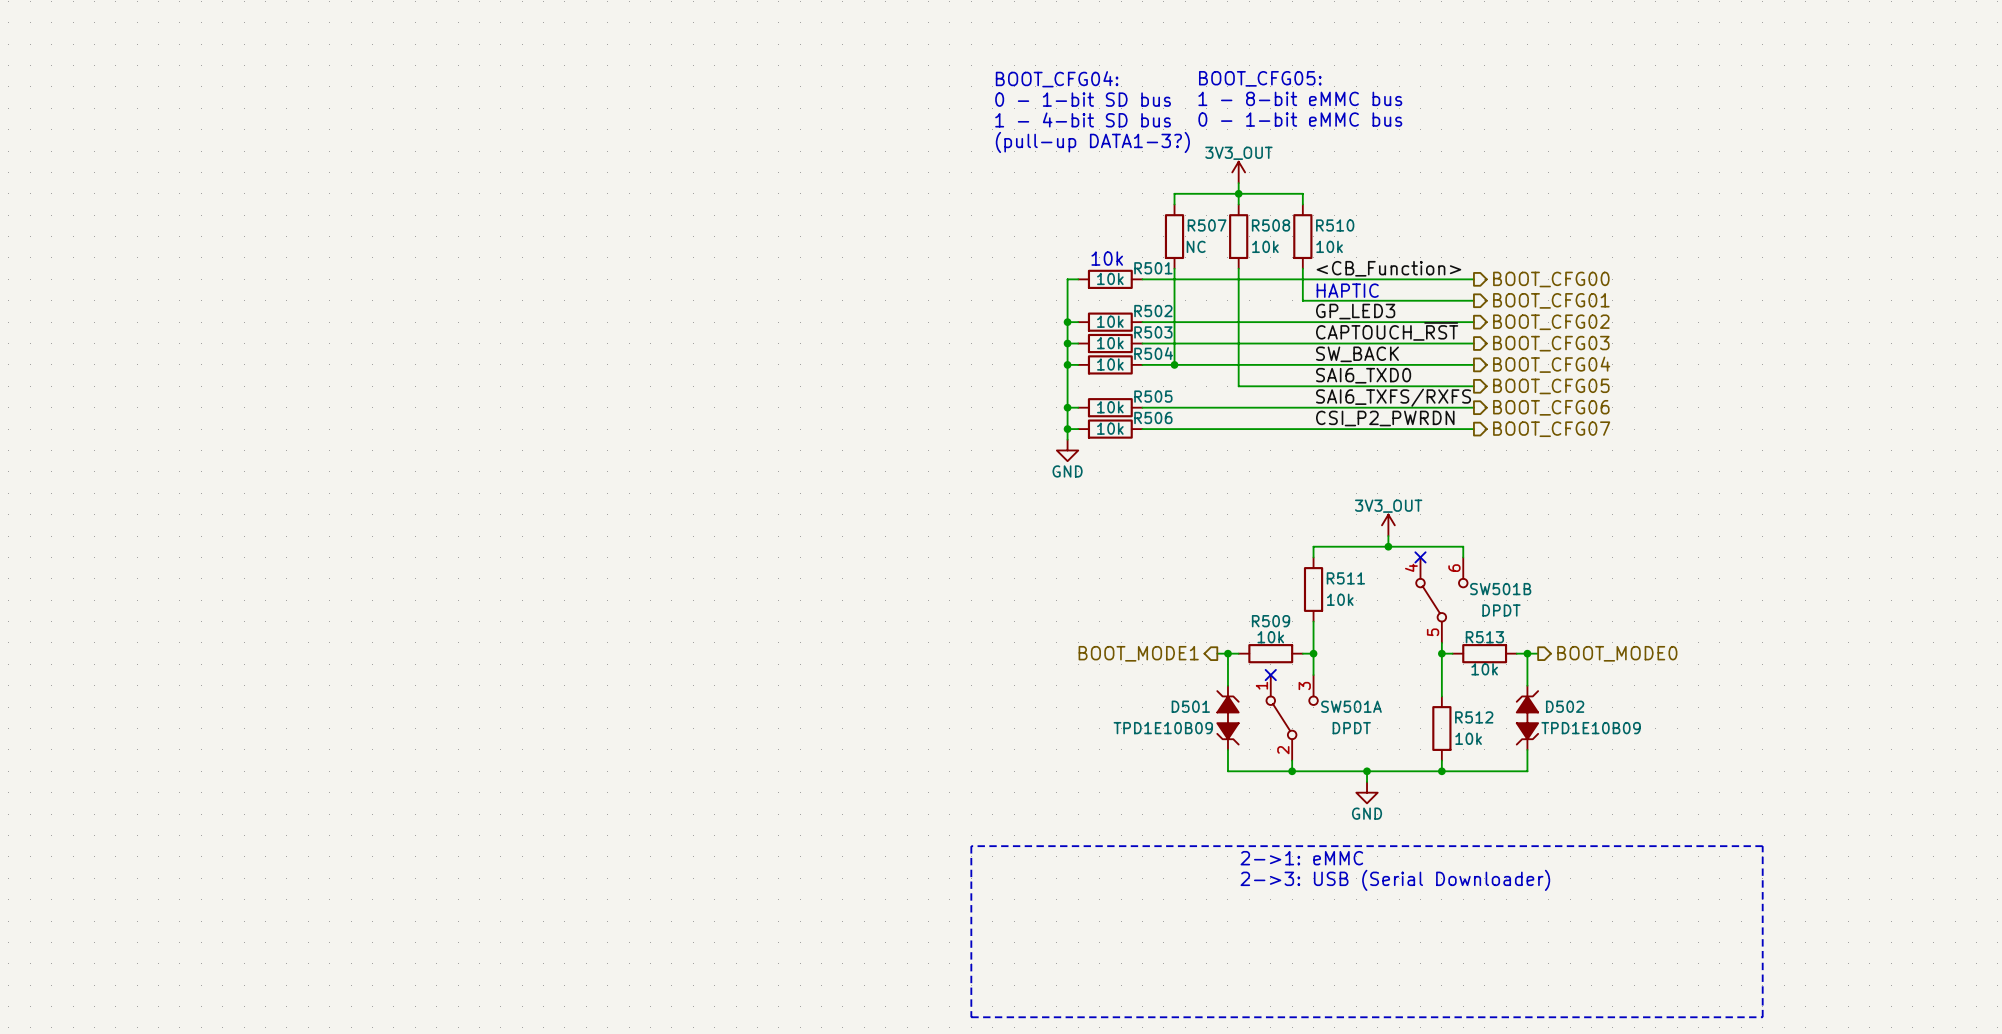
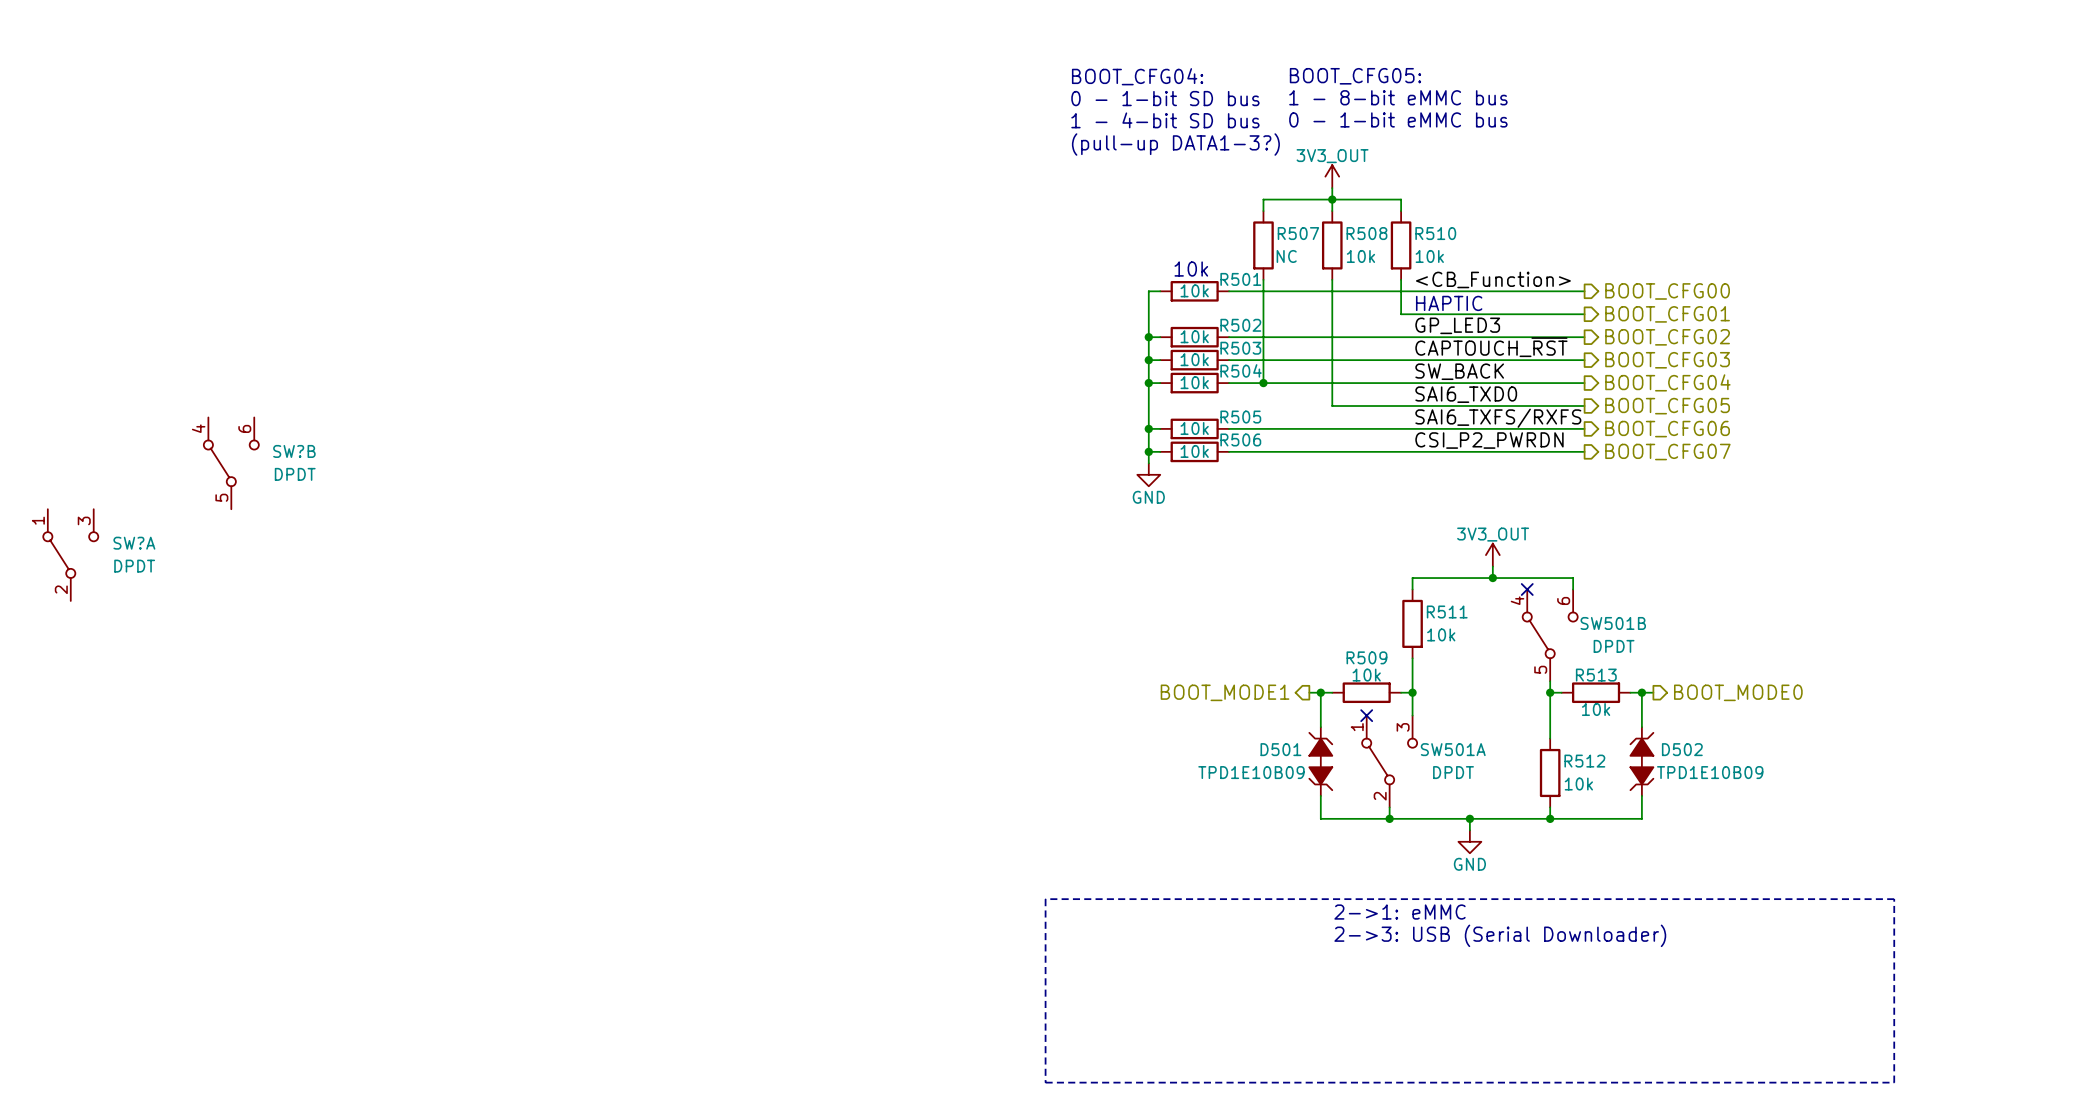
SW?B: none -> DPDT (231, 463)
SW?A: none -> DPDT (70, 555)

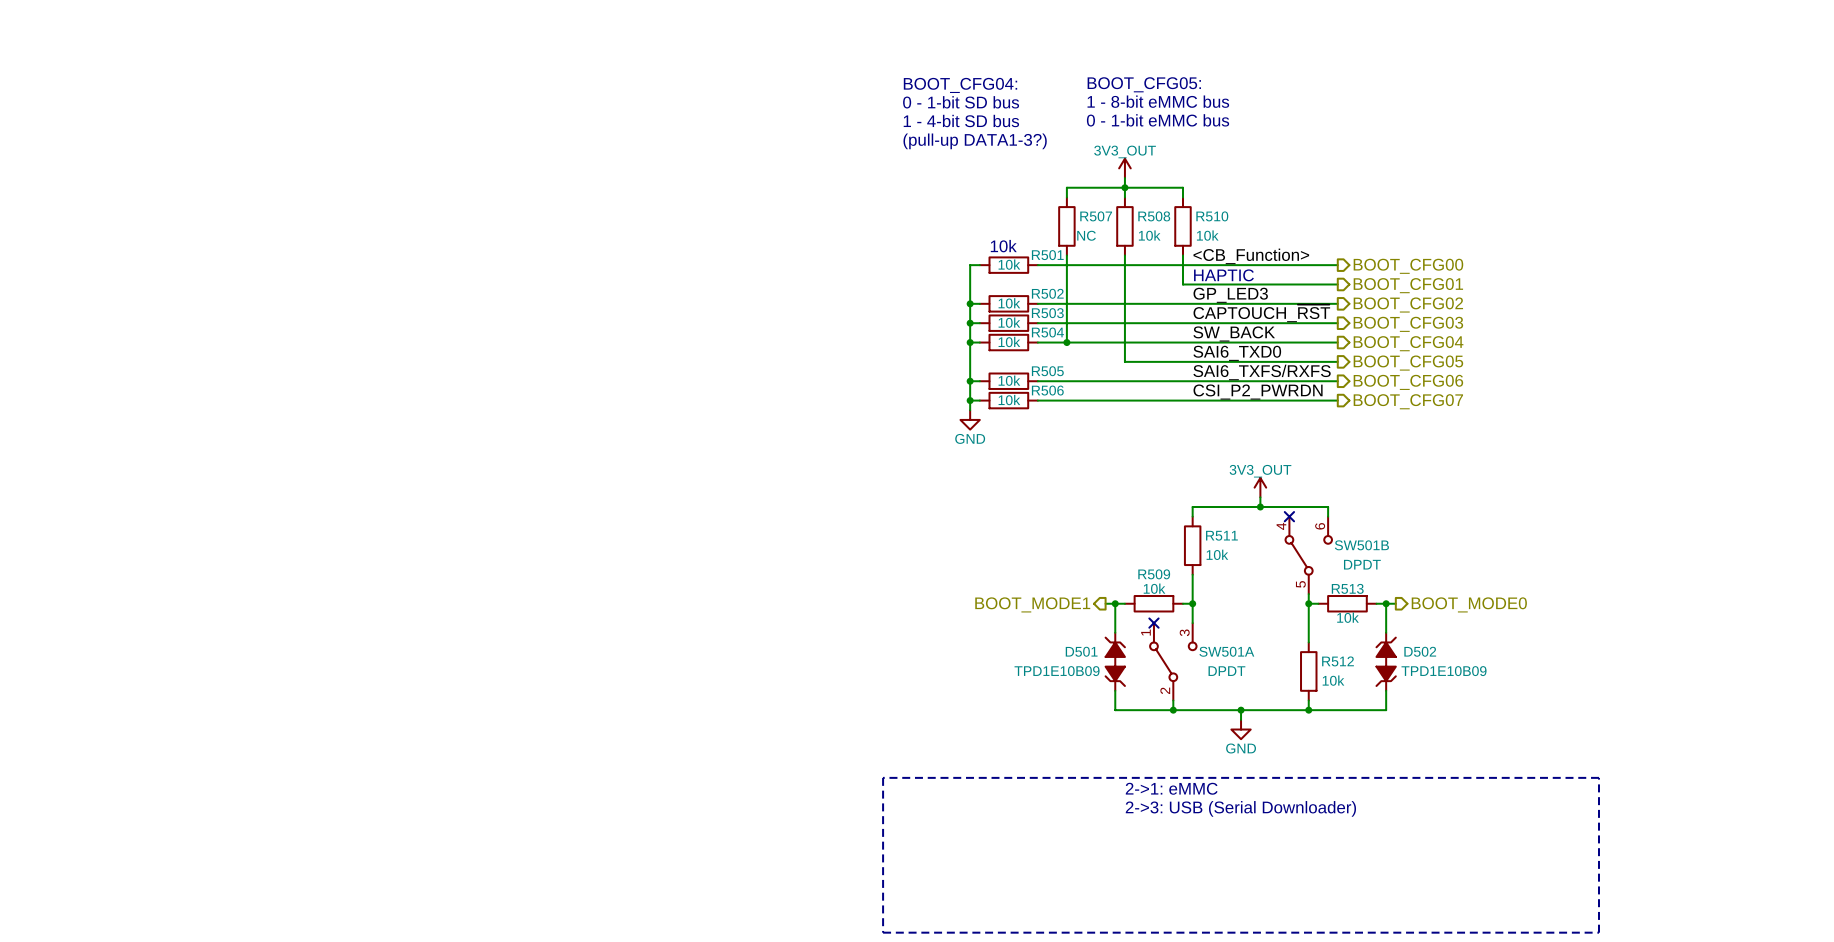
SW?B: DPDT (231, 463) -> none
SW?A: DPDT (70, 555) -> none

